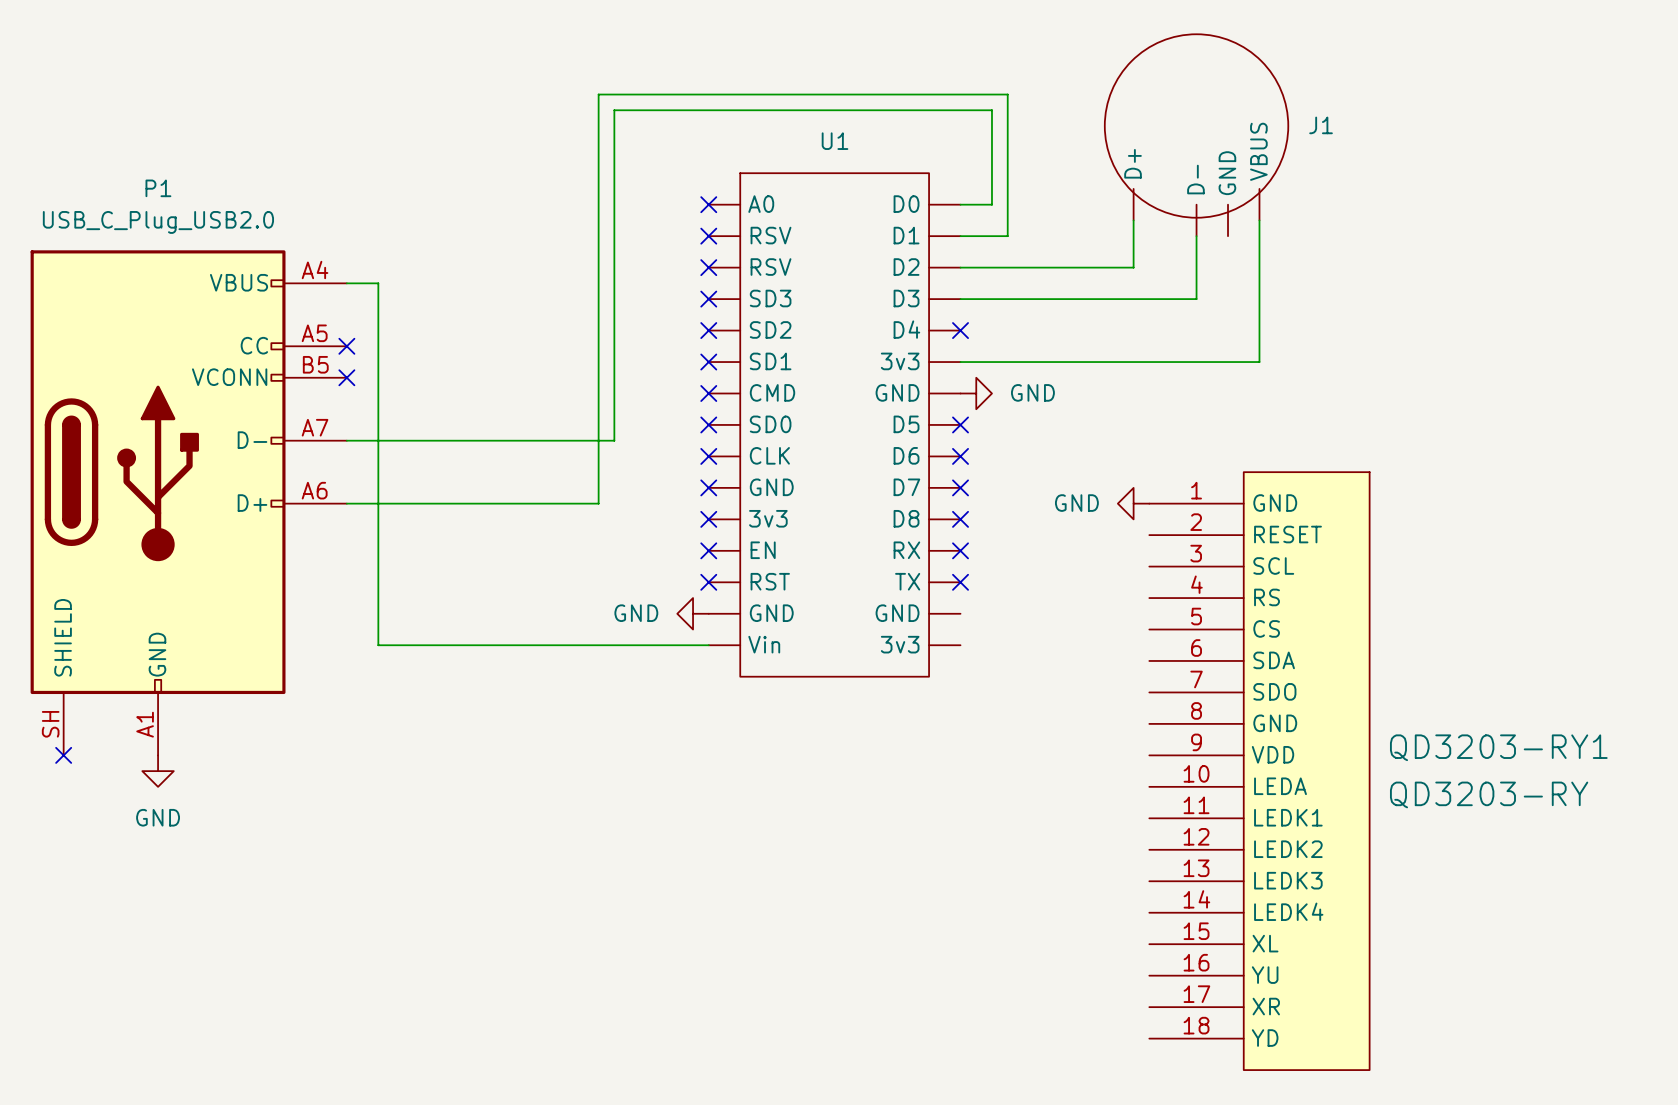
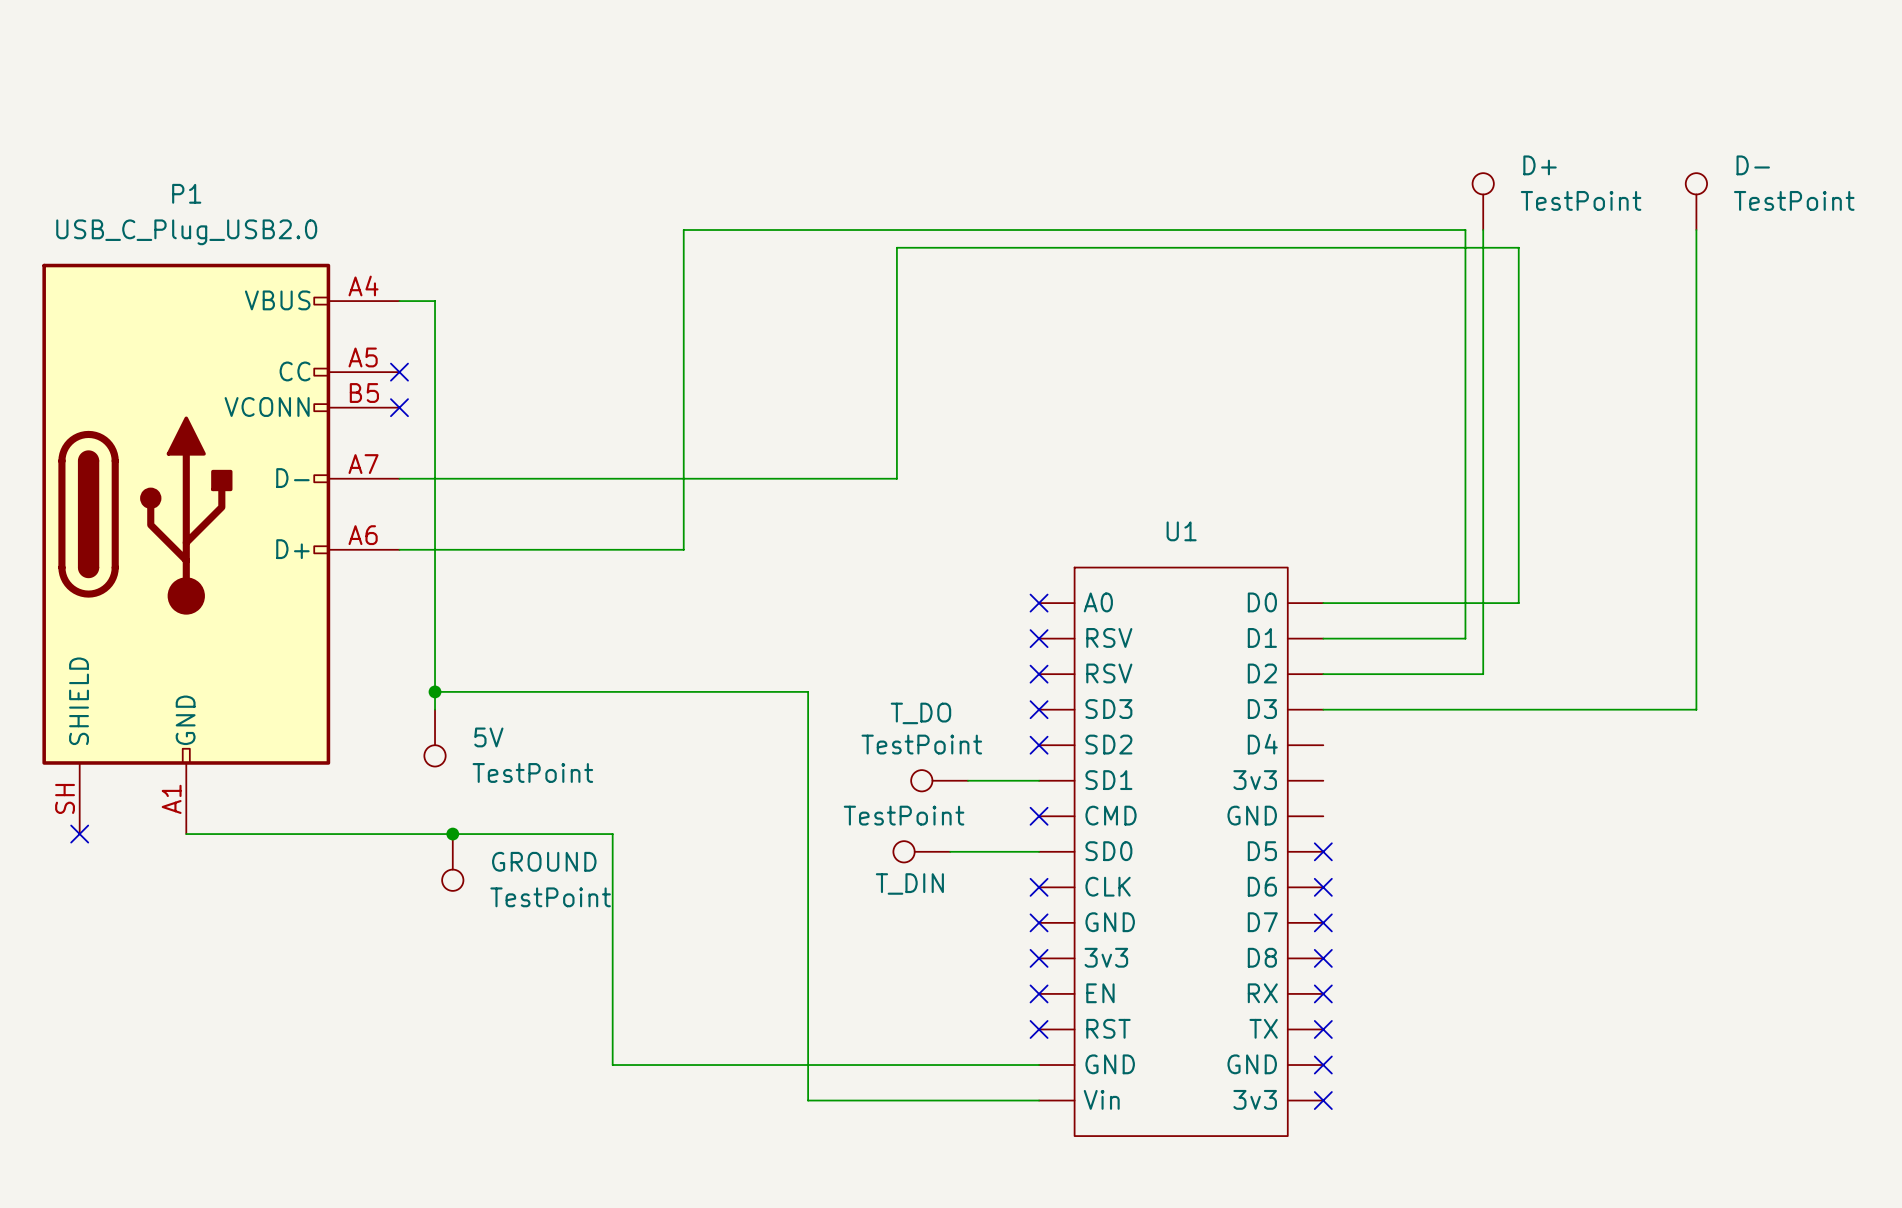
J1: (1196, 135) -> none
D+: none -> TestPoint (1483, 201)
D-: none -> TestPoint (1696, 201)
no-connect mark: (708, 204) -> none
wire: (960, 204) (991, 204) (991, 110) (614, 110) (614, 440) -> (1092, 247) (896, 247) (896, 478) (701, 478)
wire: (598, 220) (598, 94) (1007, 94) (1007, 236) -> (683, 230) (1465, 230) (1465, 638) (1323, 638)
wire: (1133, 220) (1133, 267) (960, 267) -> none
wire: (1259, 220) (1259, 362) (960, 362) -> none
wire: none -> (1483, 230) (1483, 674) (1323, 674)
wire: none -> (1696, 230) (1696, 709) (1323, 709)
no-connect mark: (708, 236) -> none
wire: none -> (1145, 247) (1518, 247) (1518, 603) (1323, 603)
wire: (1196, 236) (1196, 299) (960, 299) -> none
no-connect mark: (708, 267) -> none
no-connect mark: (708, 299) -> none
no-connect mark: (708, 330) -> none
no-connect mark: (960, 330) -> none
no-connect mark: (708, 362) -> none
no-connect mark: (708, 393) -> none
power symbol: GND (976, 393) -> none
no-connect mark: (708, 424) -> none
U1 position: (834, 424) -> (1181, 851)
no-connect mark: (960, 424) -> none
no-connect mark: (708, 456) -> none
no-connect mark: (960, 456) -> none
no-connect mark: (708, 487) -> none
no-connect mark: (960, 487) -> none
power symbol: GND (1133, 503) -> none
no-connect mark: (708, 519) -> none
no-connect mark: (960, 519) -> none
no-connect mark: (708, 550) -> none
no-connect mark: none -> (1039, 603)
no-connect mark: (960, 550) -> none
no-connect mark: (708, 582) -> none
no-connect mark: none -> (1039, 638)
no-connect mark: (960, 582) -> none
power symbol: GND (693, 613) -> none
no-connect mark: none -> (1039, 674)
wire: none -> (435, 691) (808, 691) (808, 1100) (1039, 1100)
junction: none -> (435, 691)
wire: (378, 645) (708, 645) -> none
no-connect mark: none -> (1039, 709)
5V: none -> TestPoint (435, 738)
no-connect mark: none -> (1039, 745)
T_DO: none -> TestPoint (939, 780)
wire: none -> (968, 780) (1039, 780)
no-connect mark: none -> (1039, 816)
wire: none -> (186, 834) (612, 834) (612, 1065) (1039, 1065)
junction: none -> (452, 834)
power symbol: GND (158, 771) -> none
T_DIN: none -> TestPoint (921, 851)
wire: none -> (950, 851) (1039, 851)
no-connect mark: none -> (1323, 851)
QD3203-RY1: QD3203-RY (1259, 771) -> none
GROUND: none -> TestPoint (452, 862)
no-connect mark: none -> (1039, 887)
no-connect mark: none -> (1323, 887)
no-connect mark: none -> (1039, 922)
no-connect mark: none -> (1323, 922)
no-connect mark: none -> (1039, 958)
no-connect mark: none -> (1323, 958)
no-connect mark: none -> (1039, 993)
no-connect mark: none -> (1323, 993)
no-connect mark: none -> (1039, 1029)
no-connect mark: none -> (1323, 1029)
no-connect mark: none -> (1323, 1065)
no-connect mark: none -> (1323, 1100)

